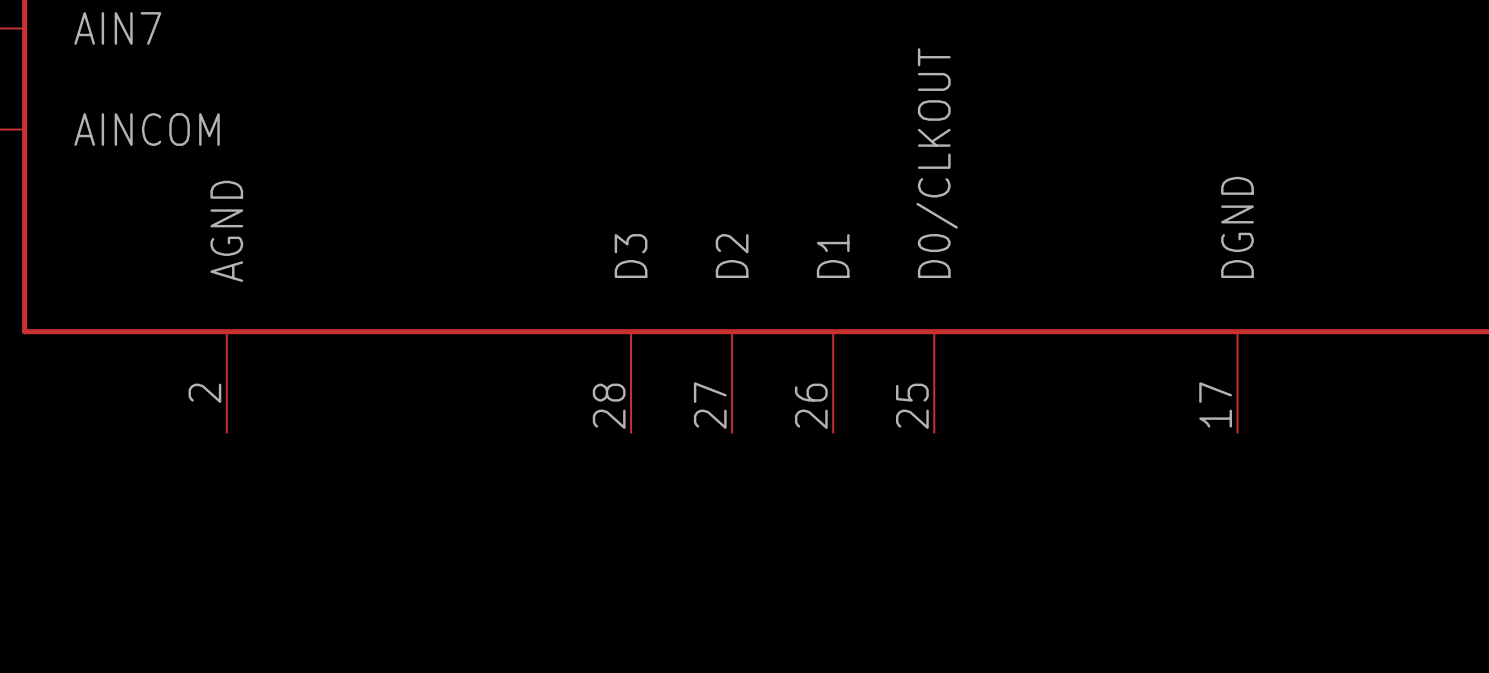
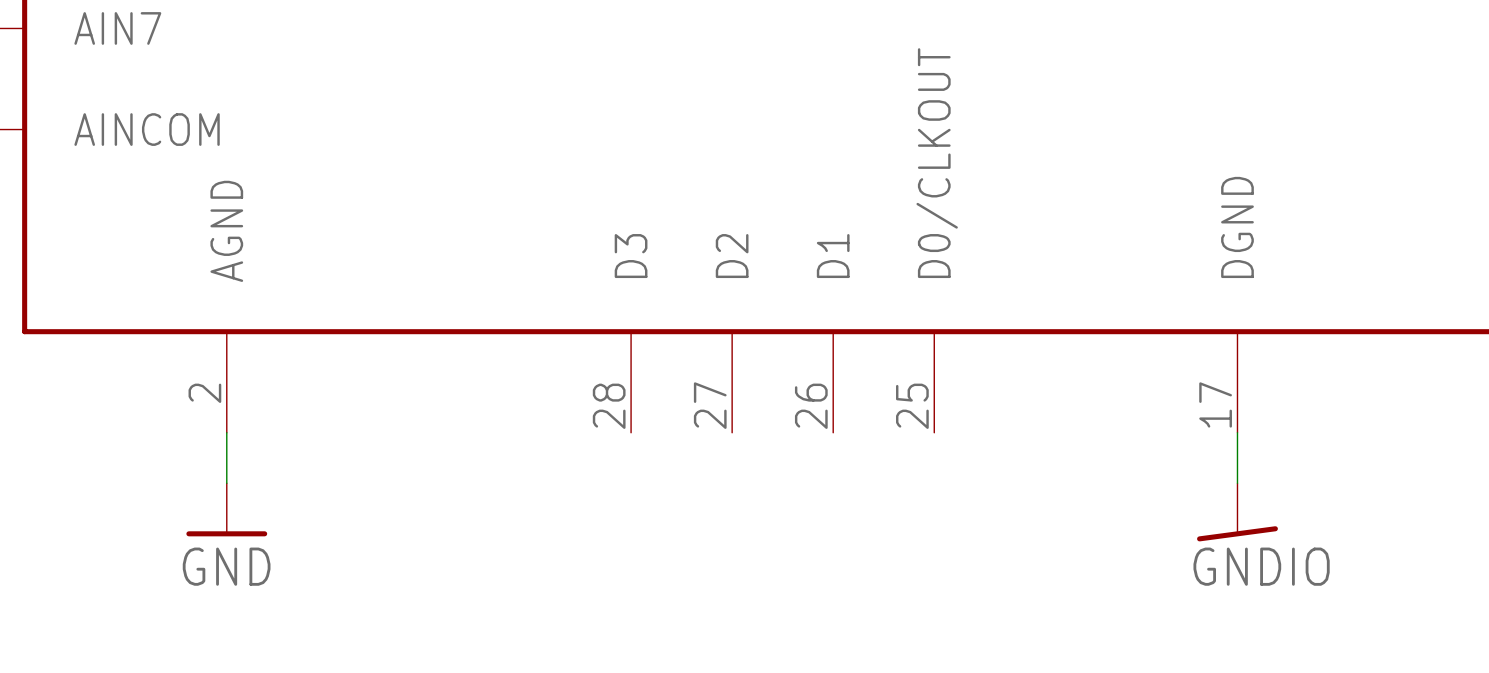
wire: none -> (226, 432) (226, 483)
wire: none -> (1237, 432) (1237, 483)
power symbol: none -> GND (226, 509)
power symbol: none -> GNDIO (1237, 512)

